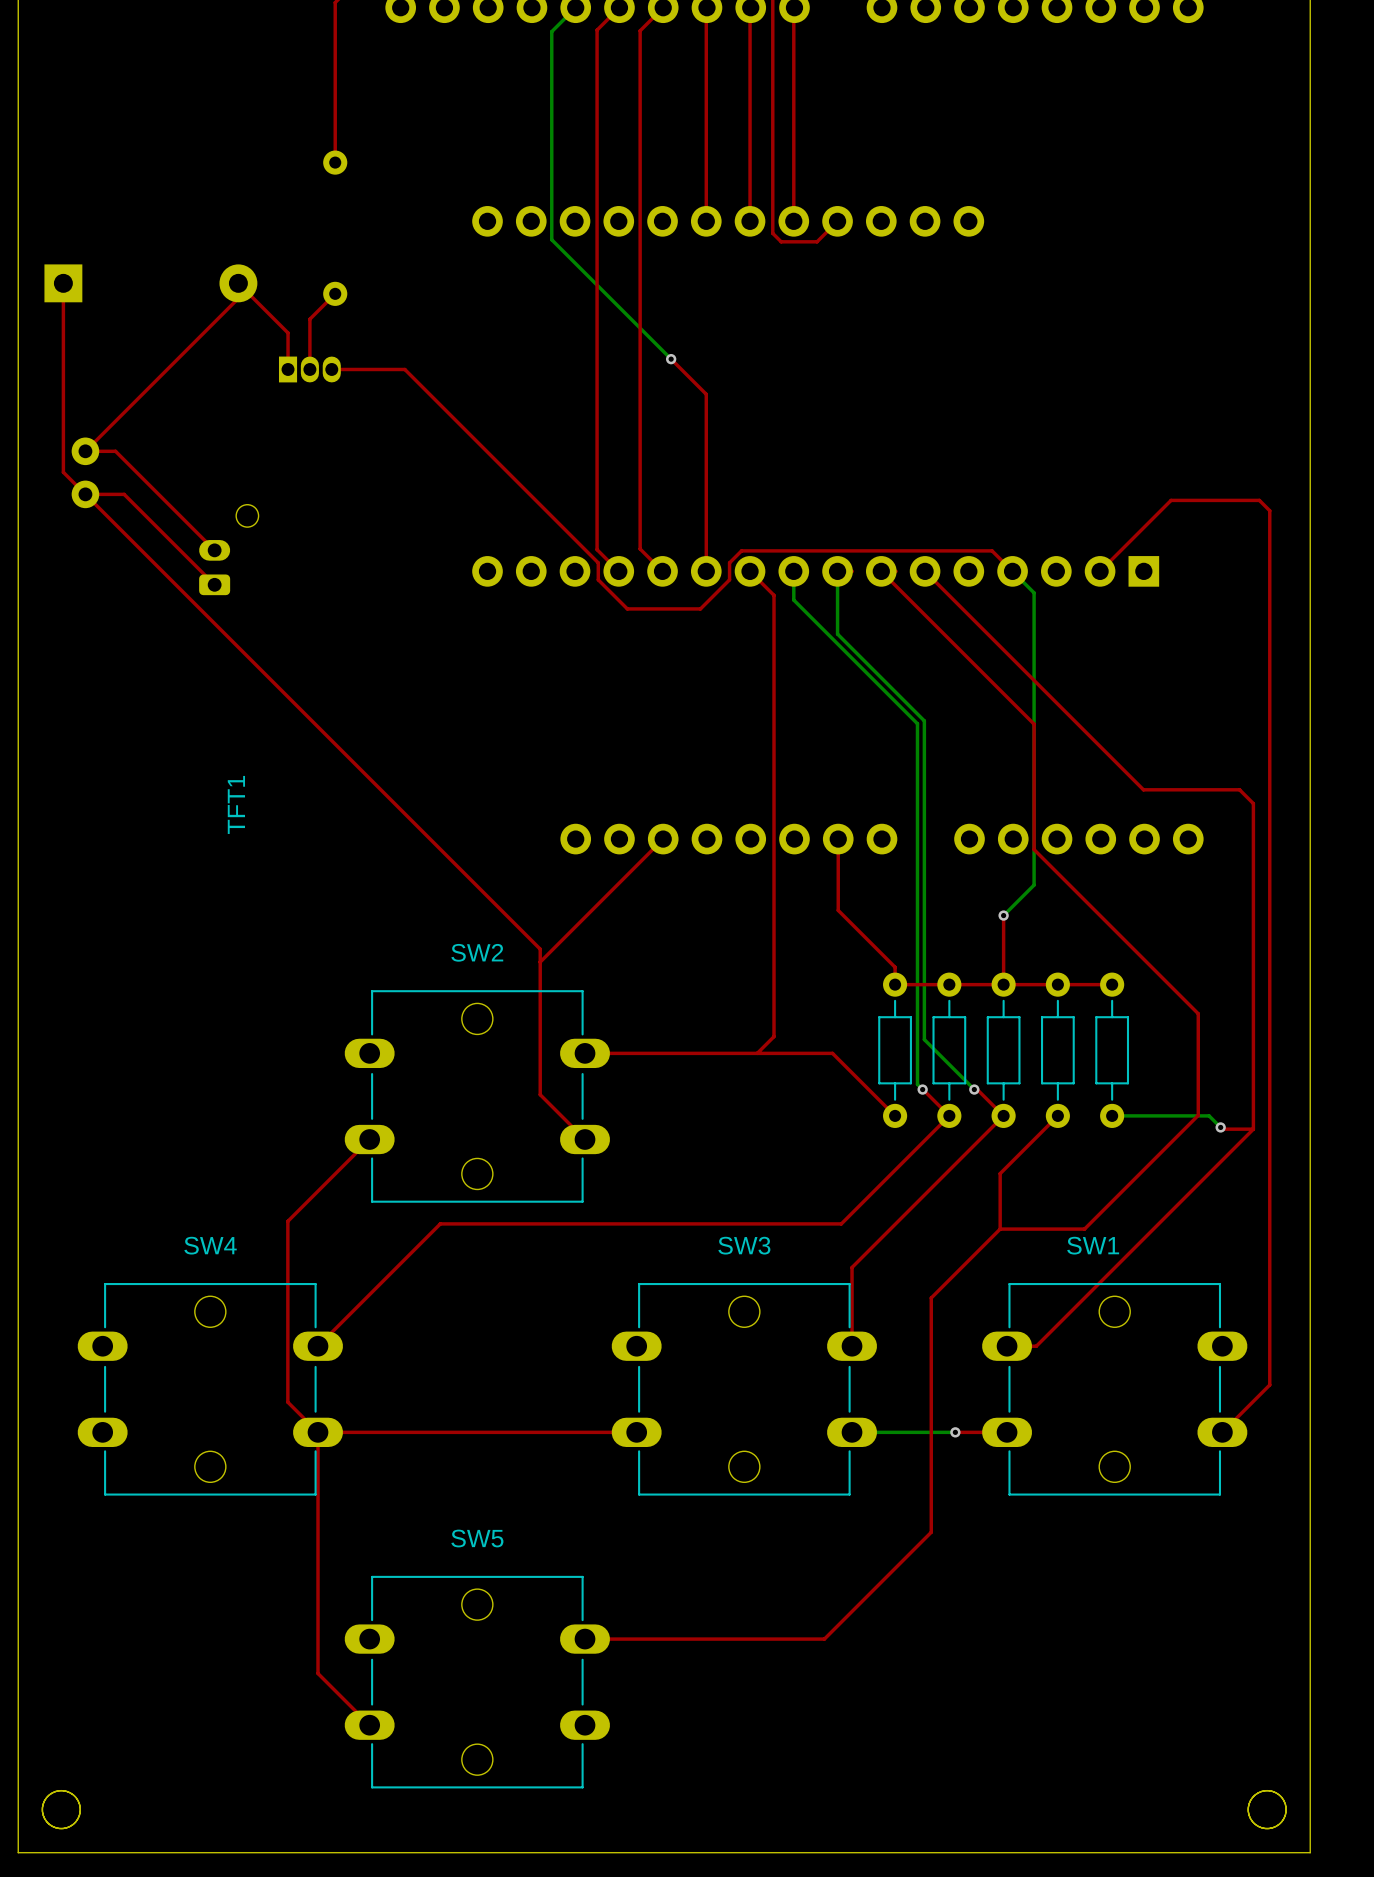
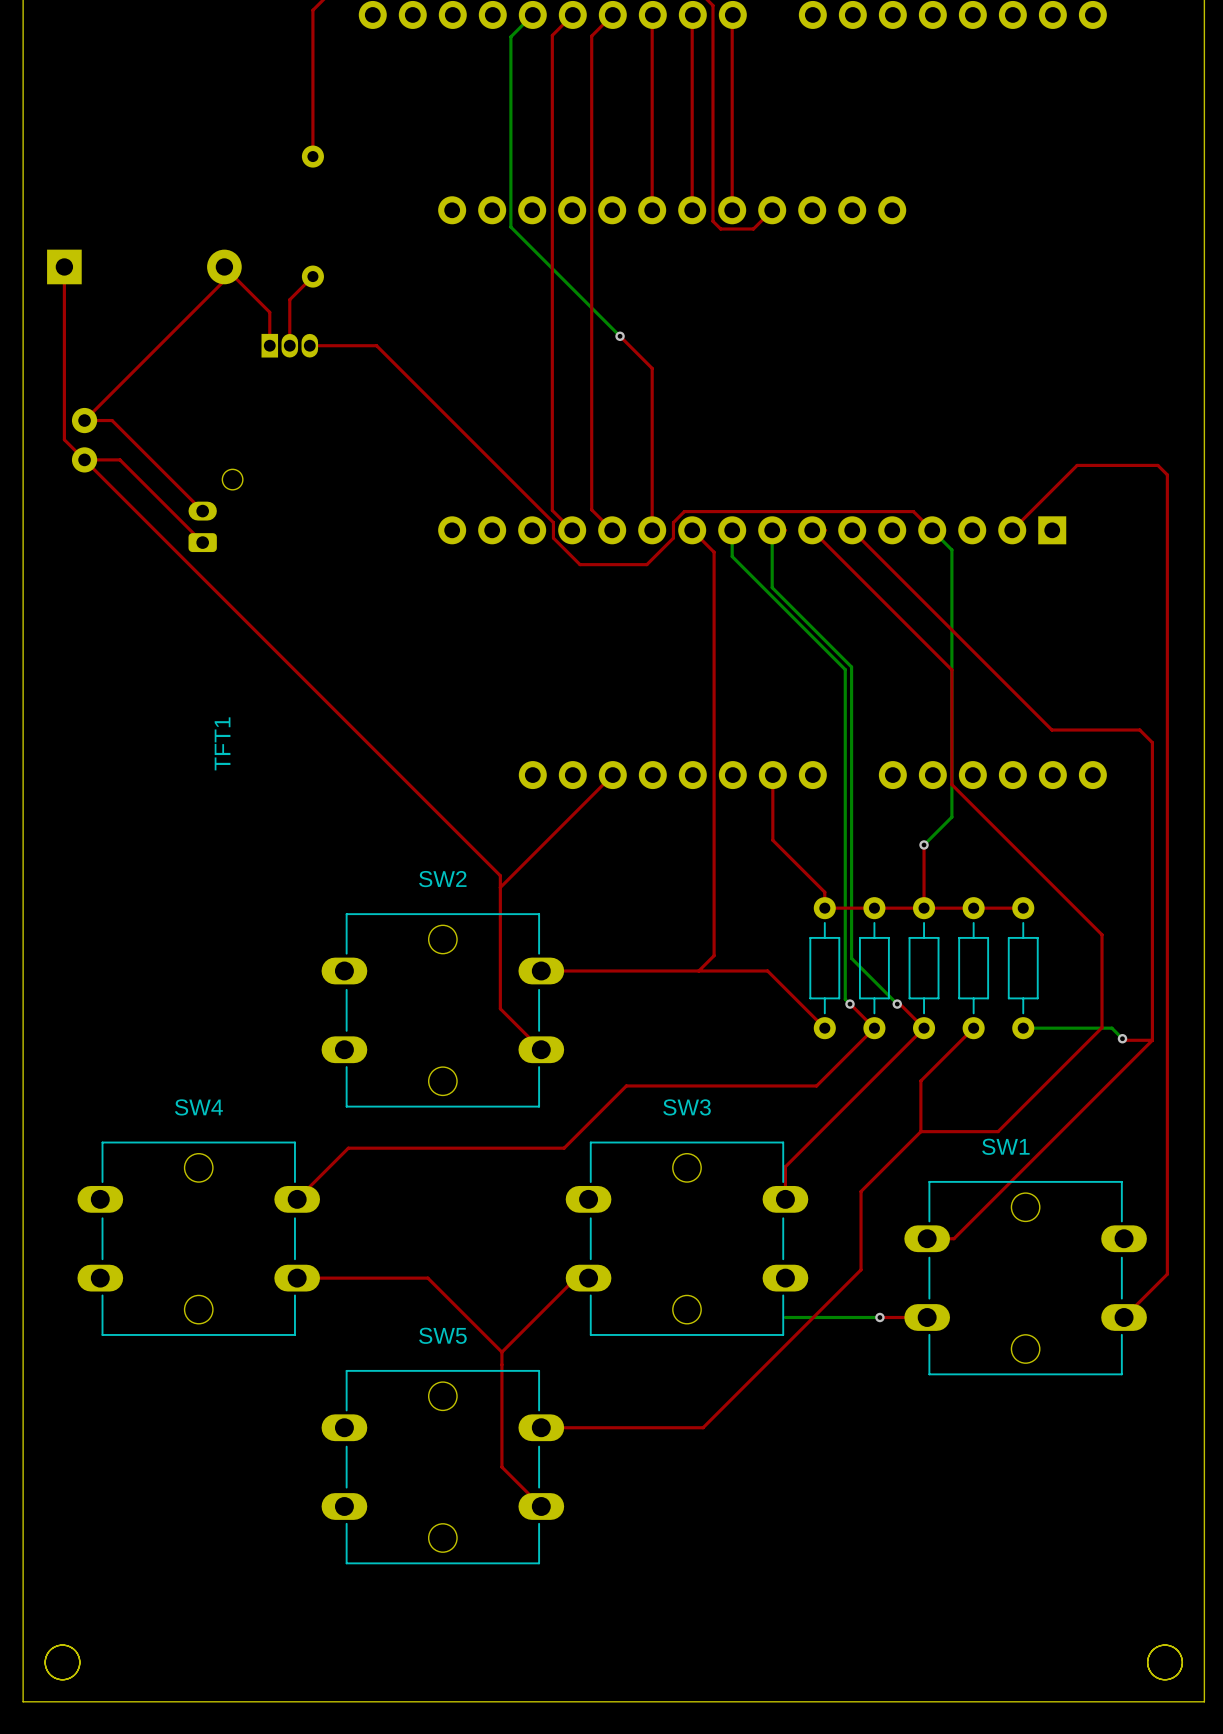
top track: (369, 1139) (287, 1221) (287, 1402) (318, 1432) -> none
top track: (886, 1179) (841, 1223) (440, 1223) (318, 1346) -> (816, 1085) (626, 1085) (564, 1148) (348, 1148) (297, 1199)
top track: (934, 1294) (931, 1297) (931, 1532) (824, 1639) (585, 1639) -> (861, 1191) (861, 1269) (703, 1427) (541, 1427)
top track: (852, 1303) (852, 1346) -> none
SW4 position: (210, 1389) -> (198, 1238)
top track: none -> (297, 1278) (427, 1278) (501, 1352)
top track: none -> (588, 1278) (575, 1278) (501, 1352)
SW3 position: (744, 1389) -> (686, 1238)
top track: (318, 1432) (636, 1432) -> none
top track: (318, 1432) (318, 1673) (369, 1725) -> none
top track: none -> (501, 1352) (501, 1467) (541, 1506)
SW5 position: (477, 1682) -> (442, 1467)

